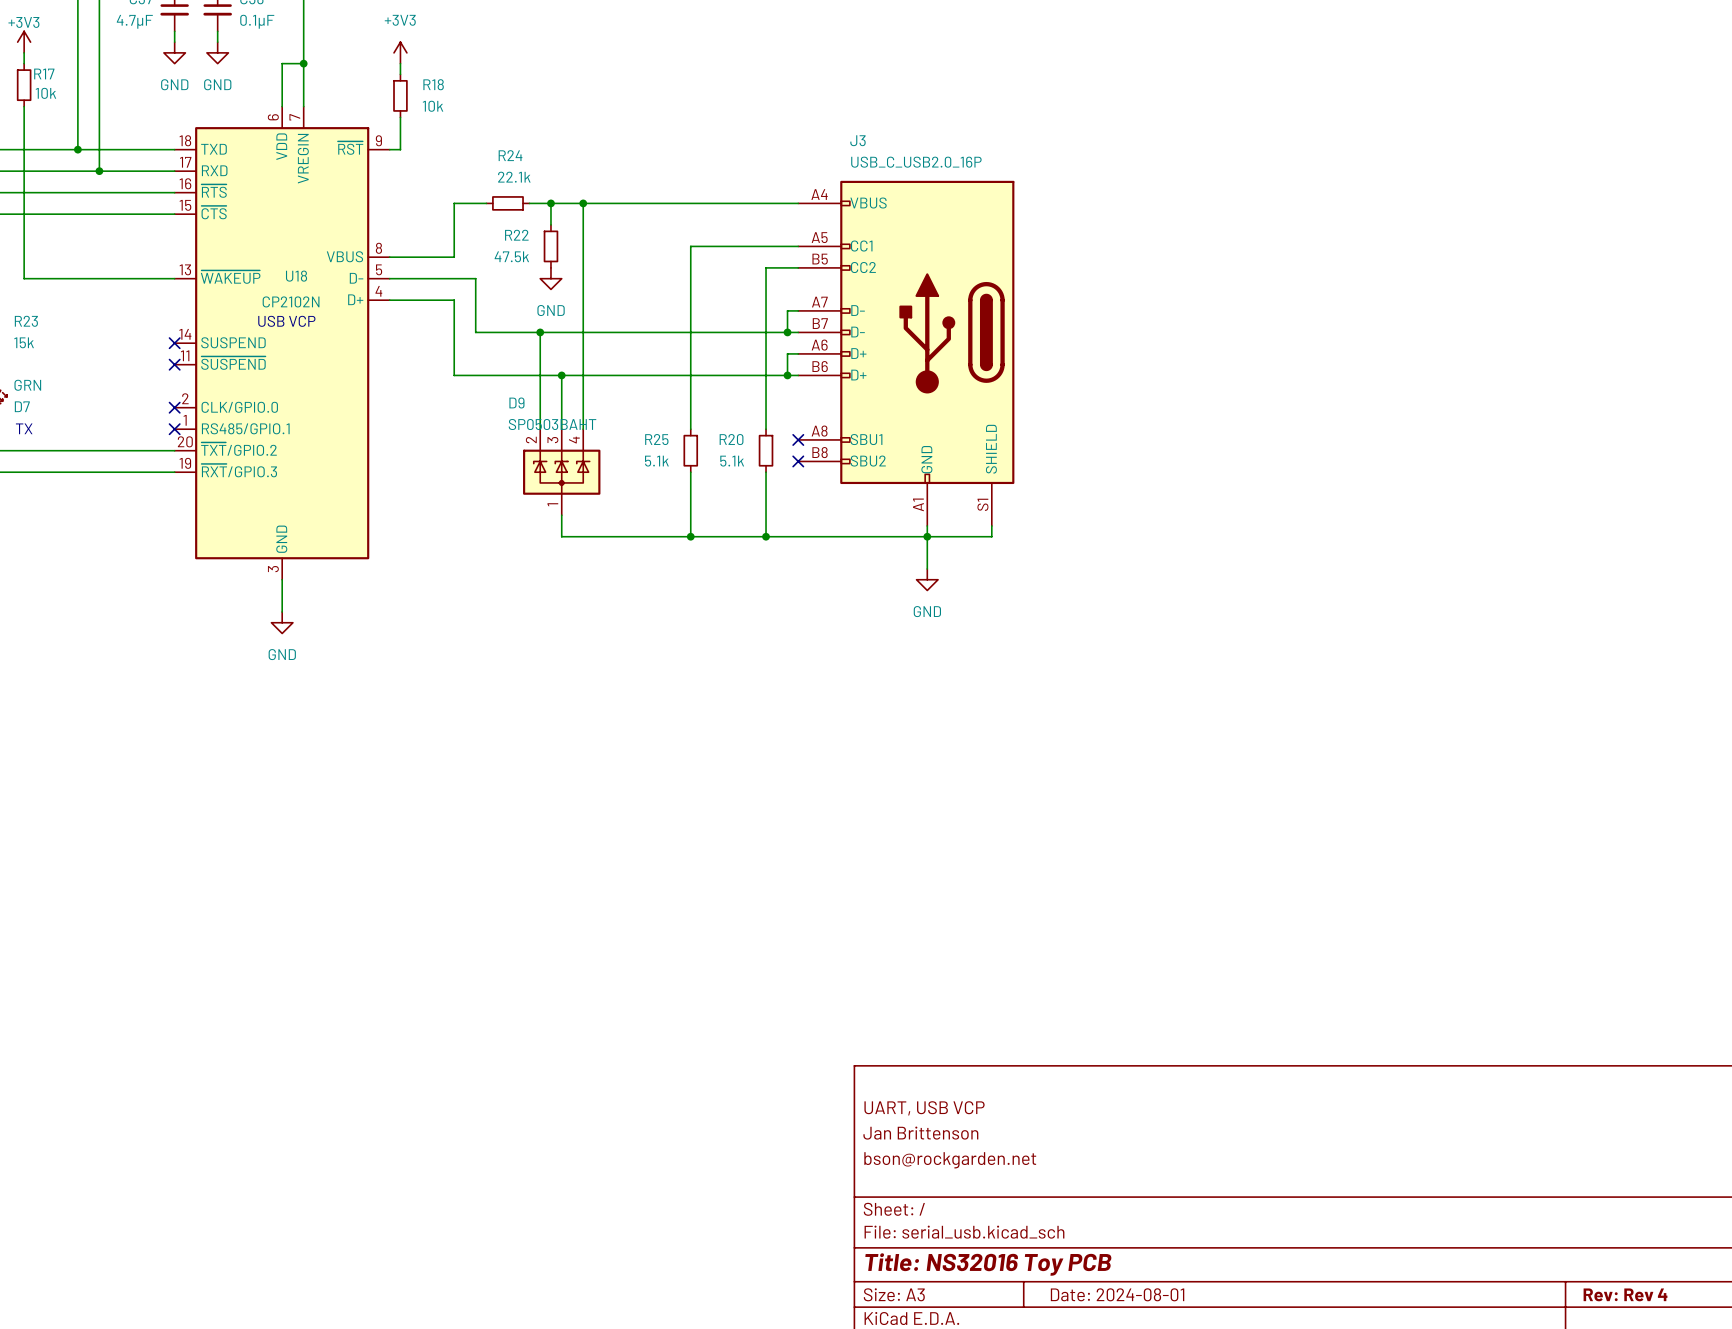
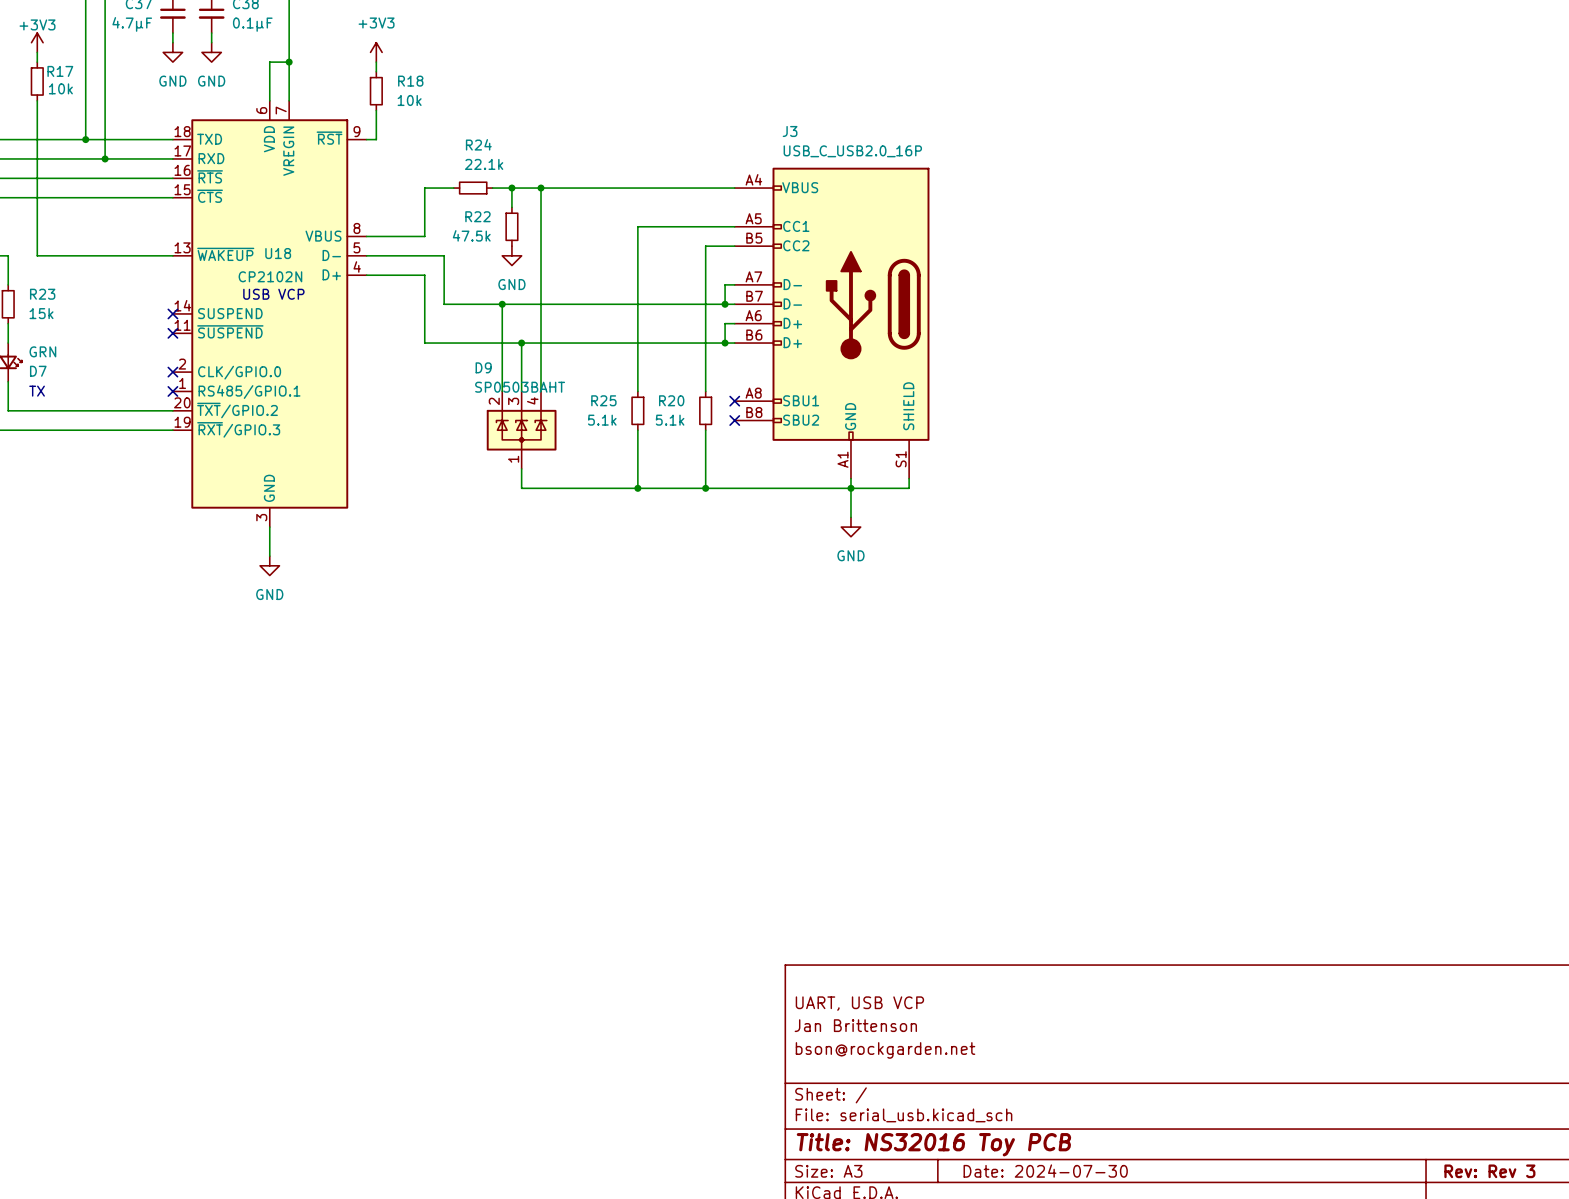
title block: Date: 2024-08-01 (1117, 1294) -> Date: 2024-07-30 (1045, 1171)
title block: Rev: Rev 4 (1625, 1294) -> Rev: Rev 3 (1489, 1171)

